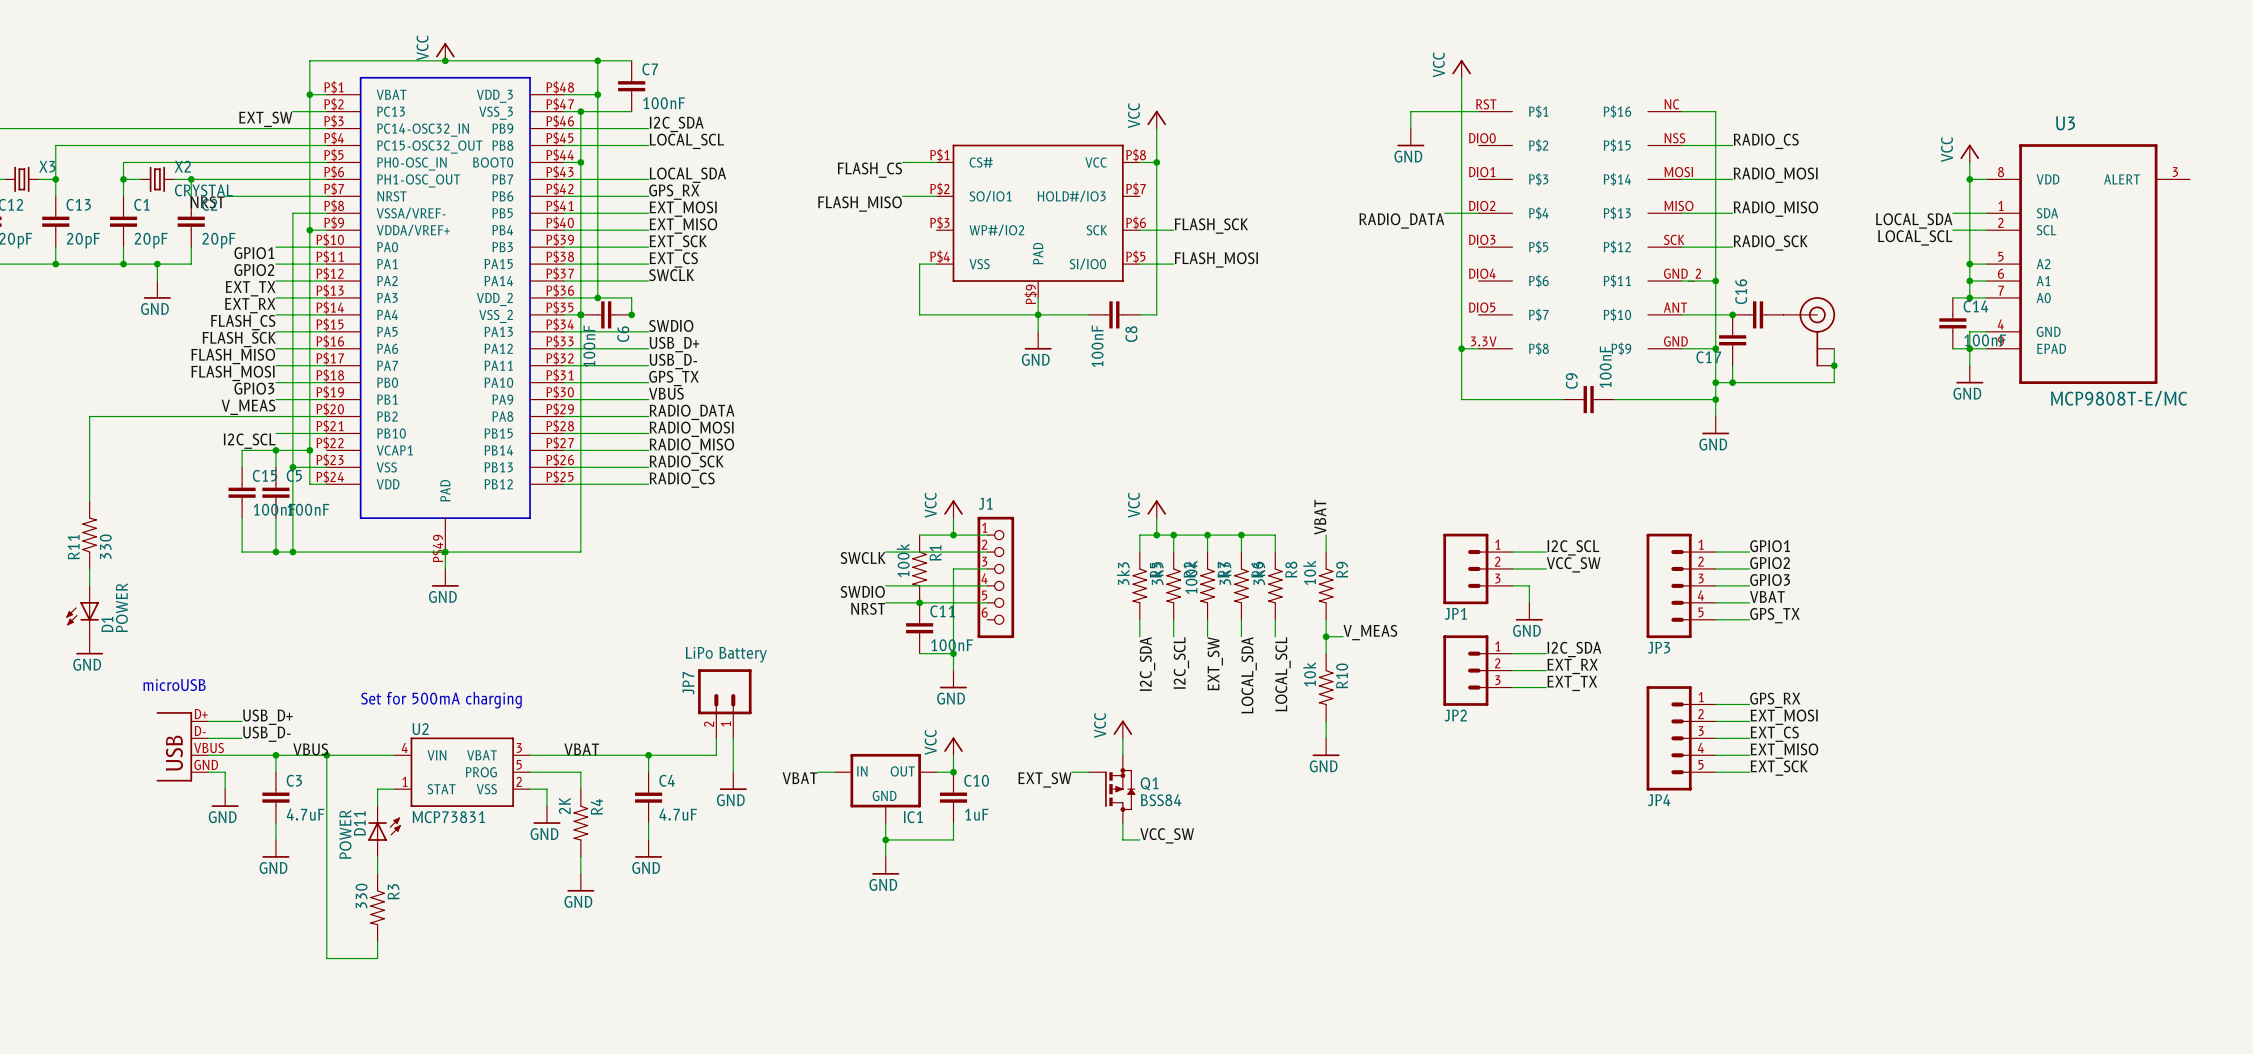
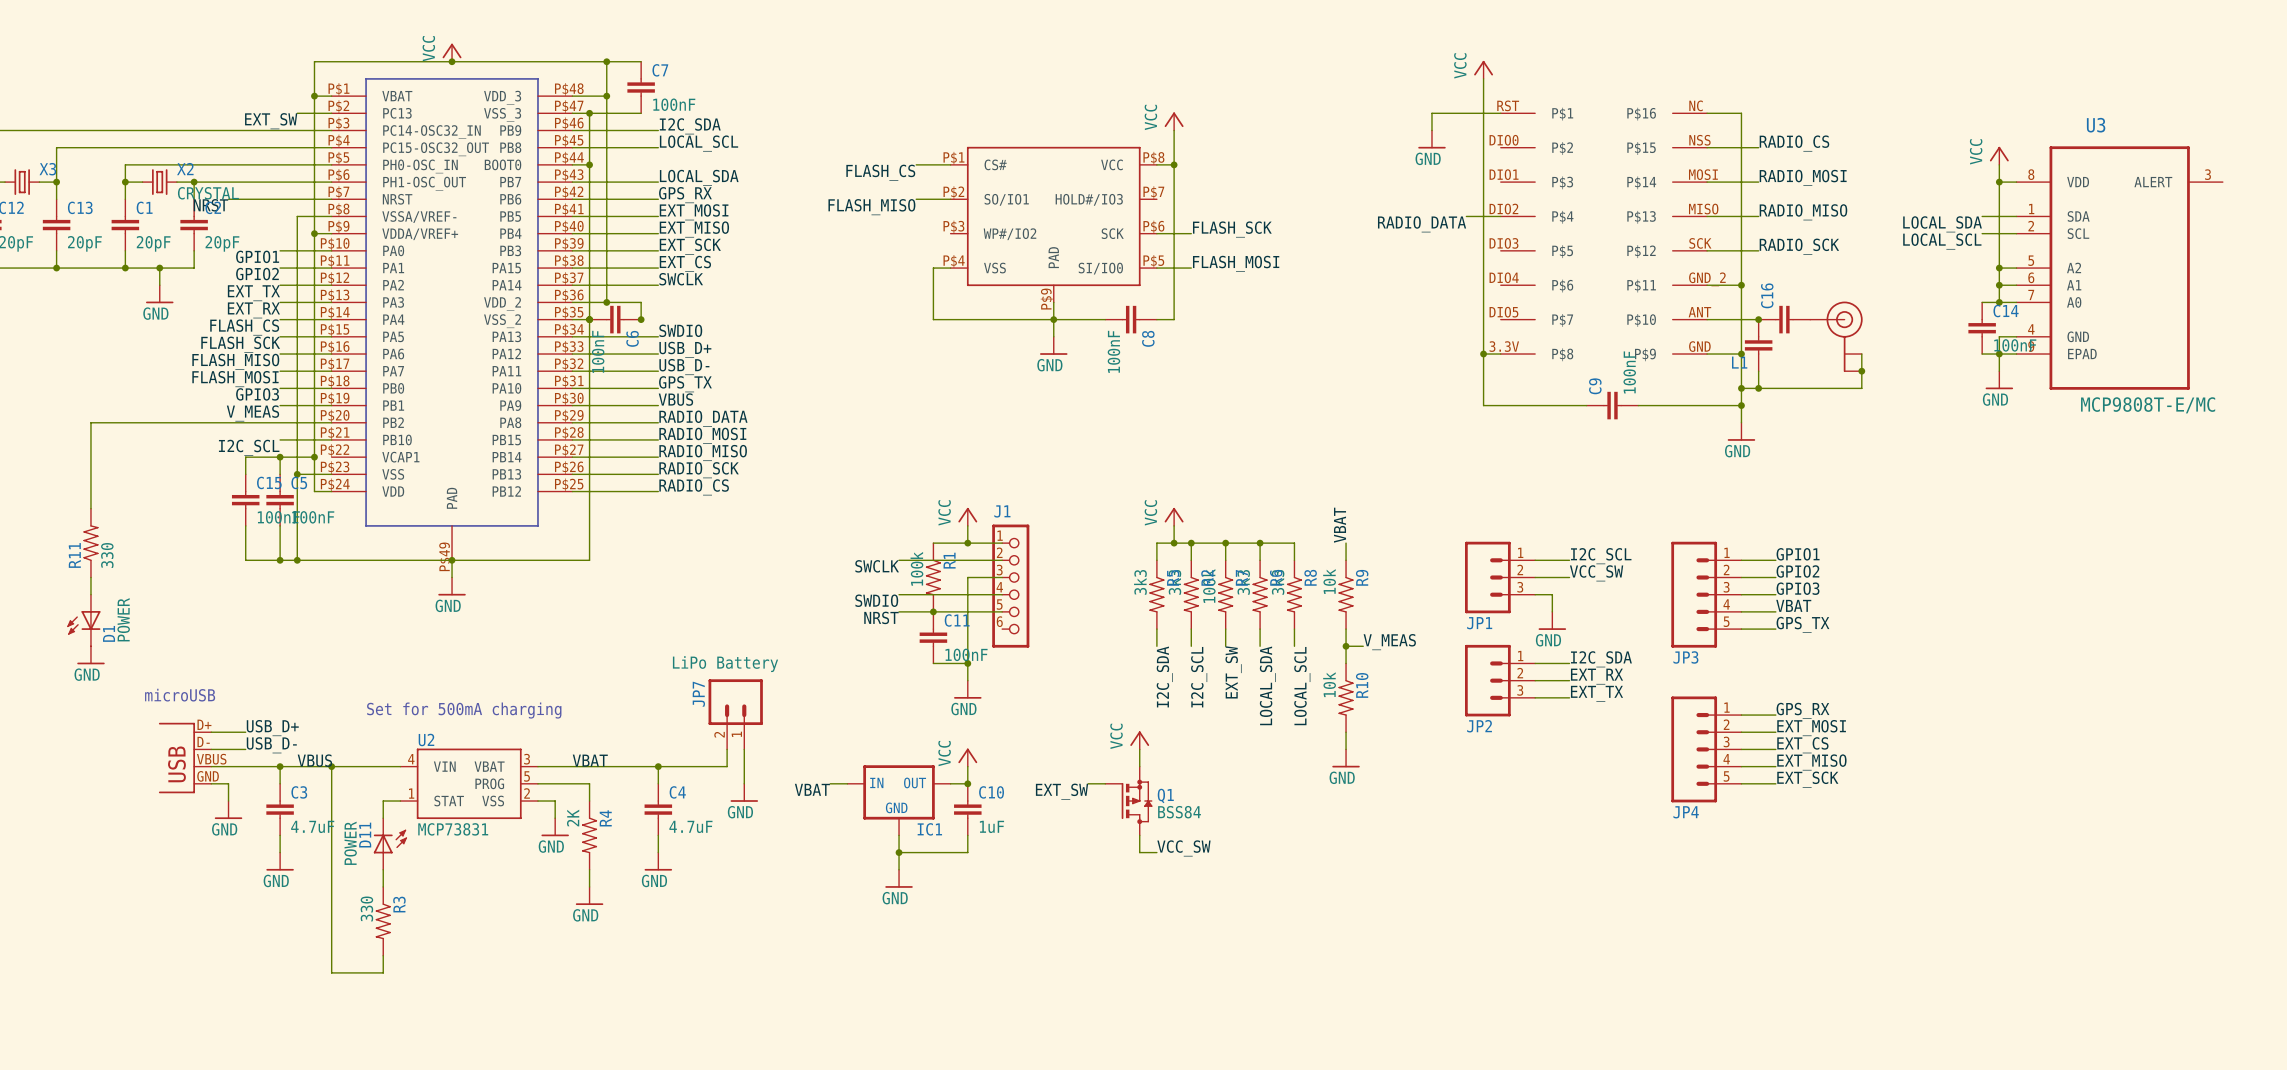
C17 name: C17 (1708, 357) -> L1 (1739, 362)

